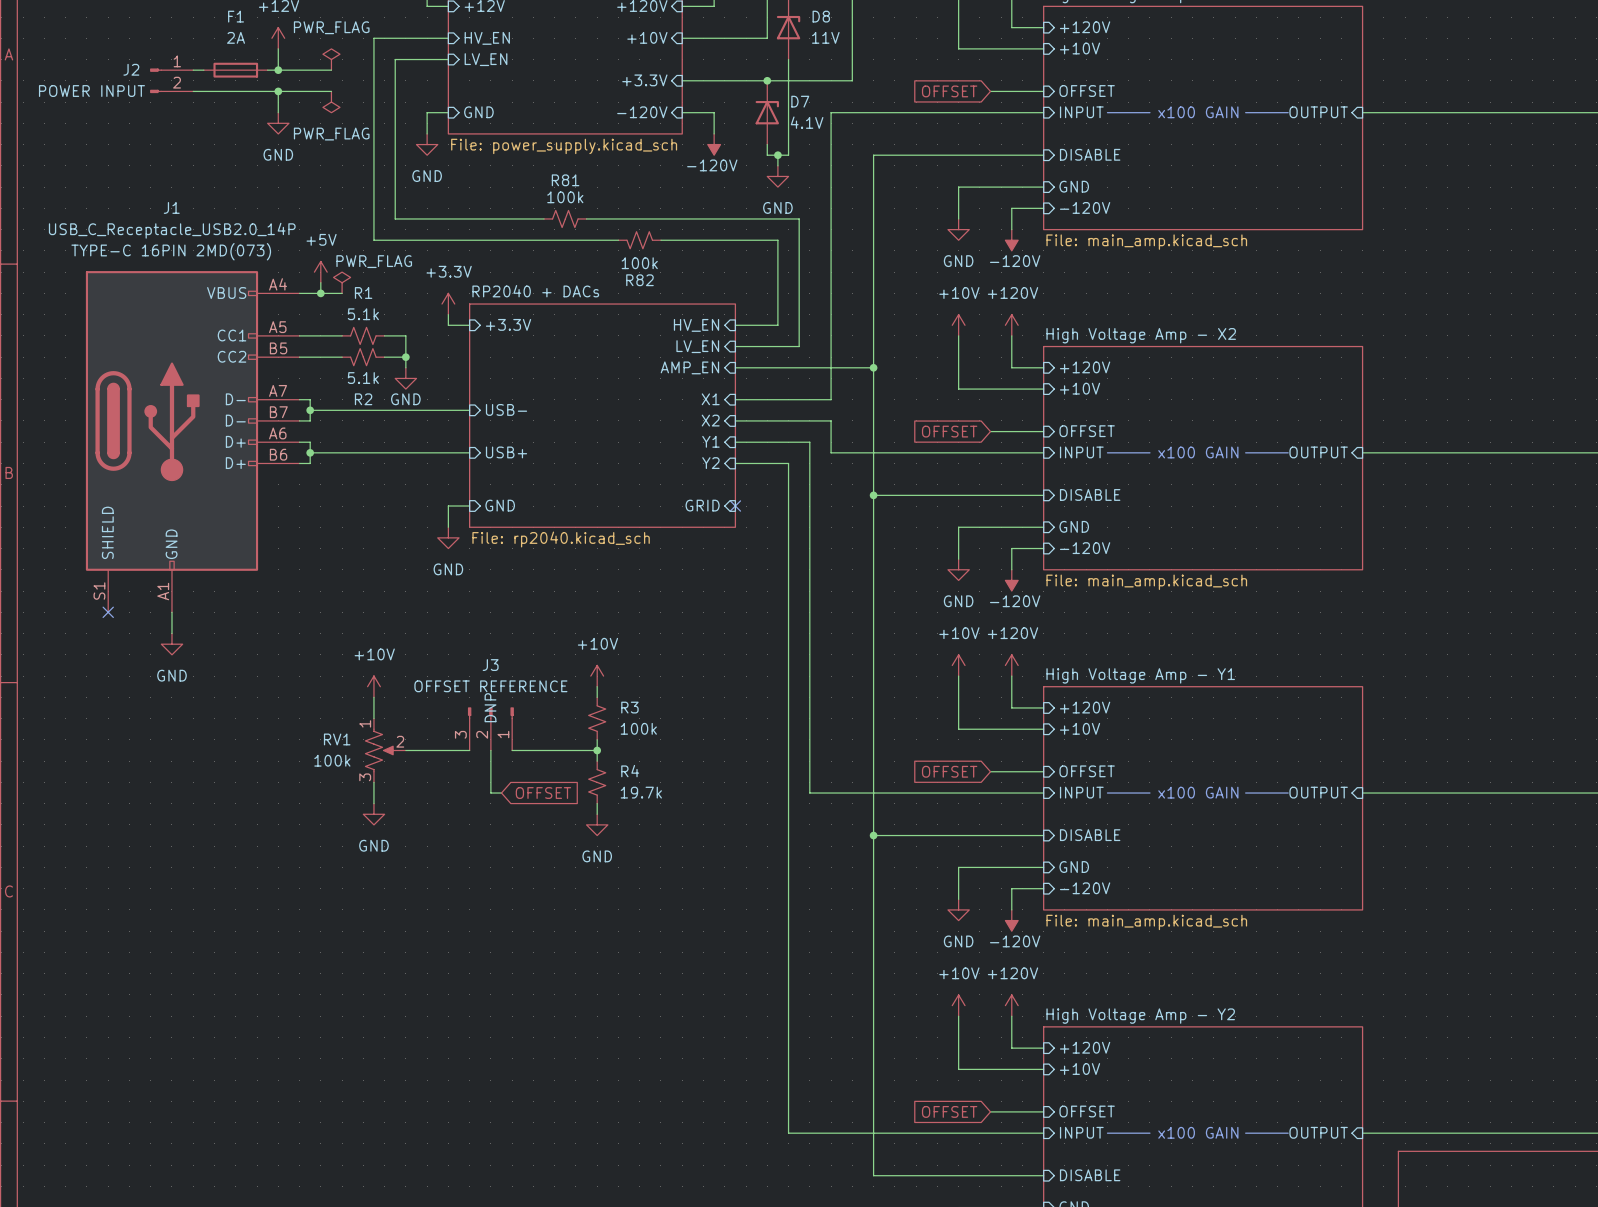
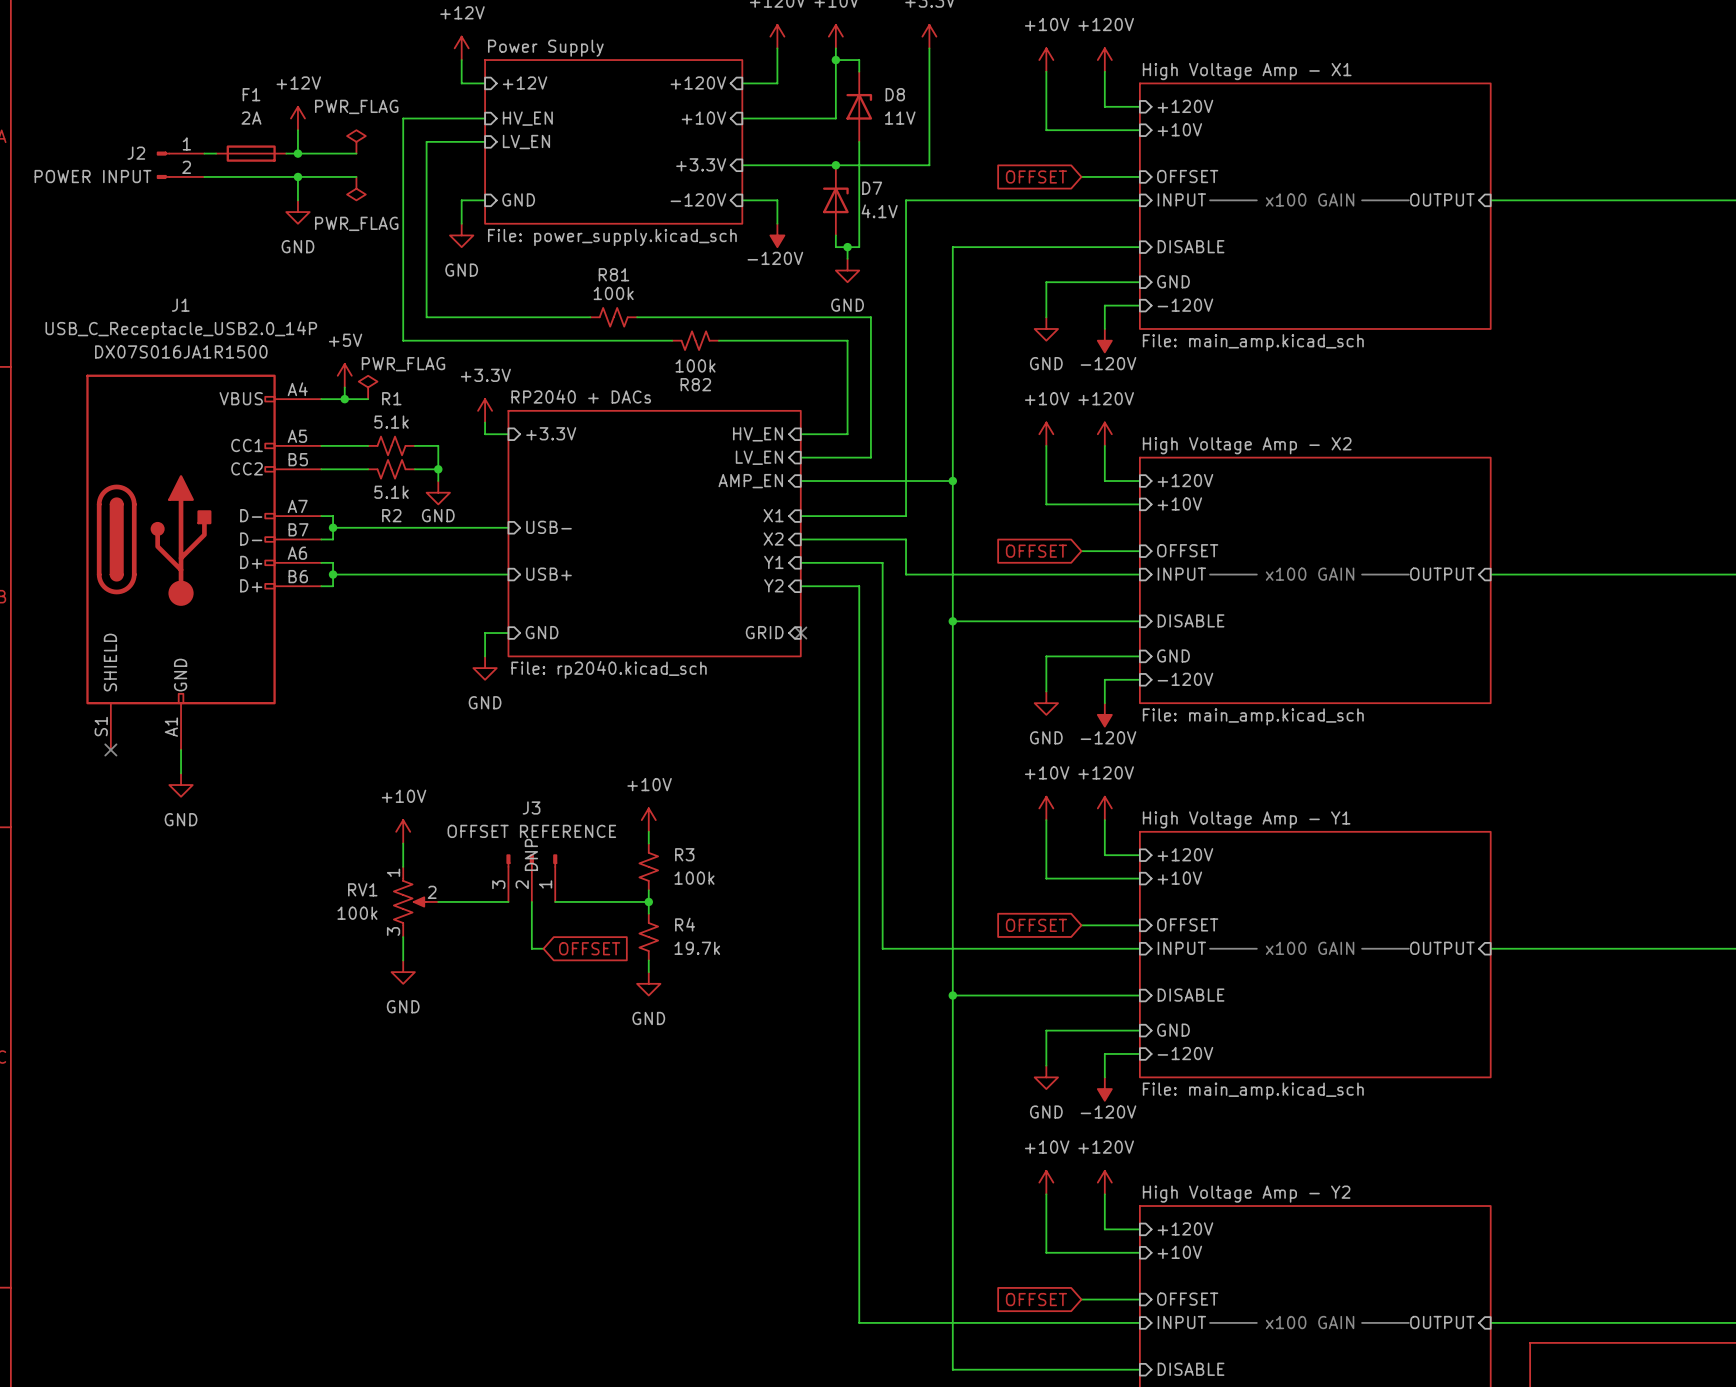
J1 text: TYPE-C 16PIN 2MD(073) (171, 251) -> DX07S016JA1R1500 (181, 351)

